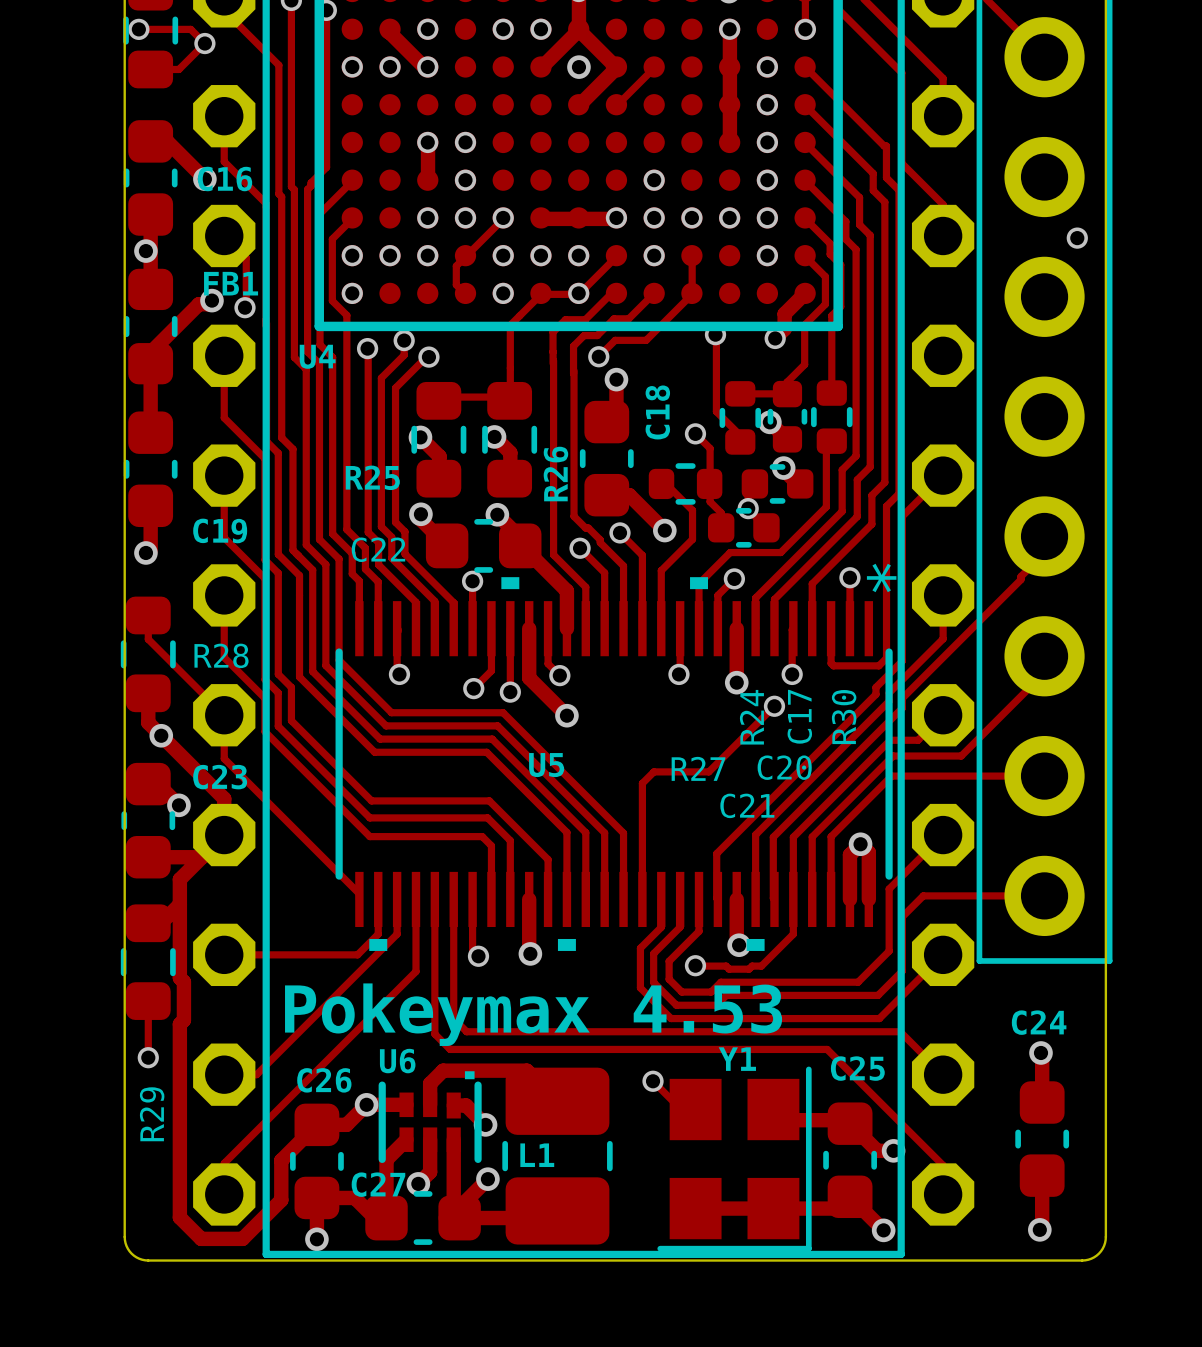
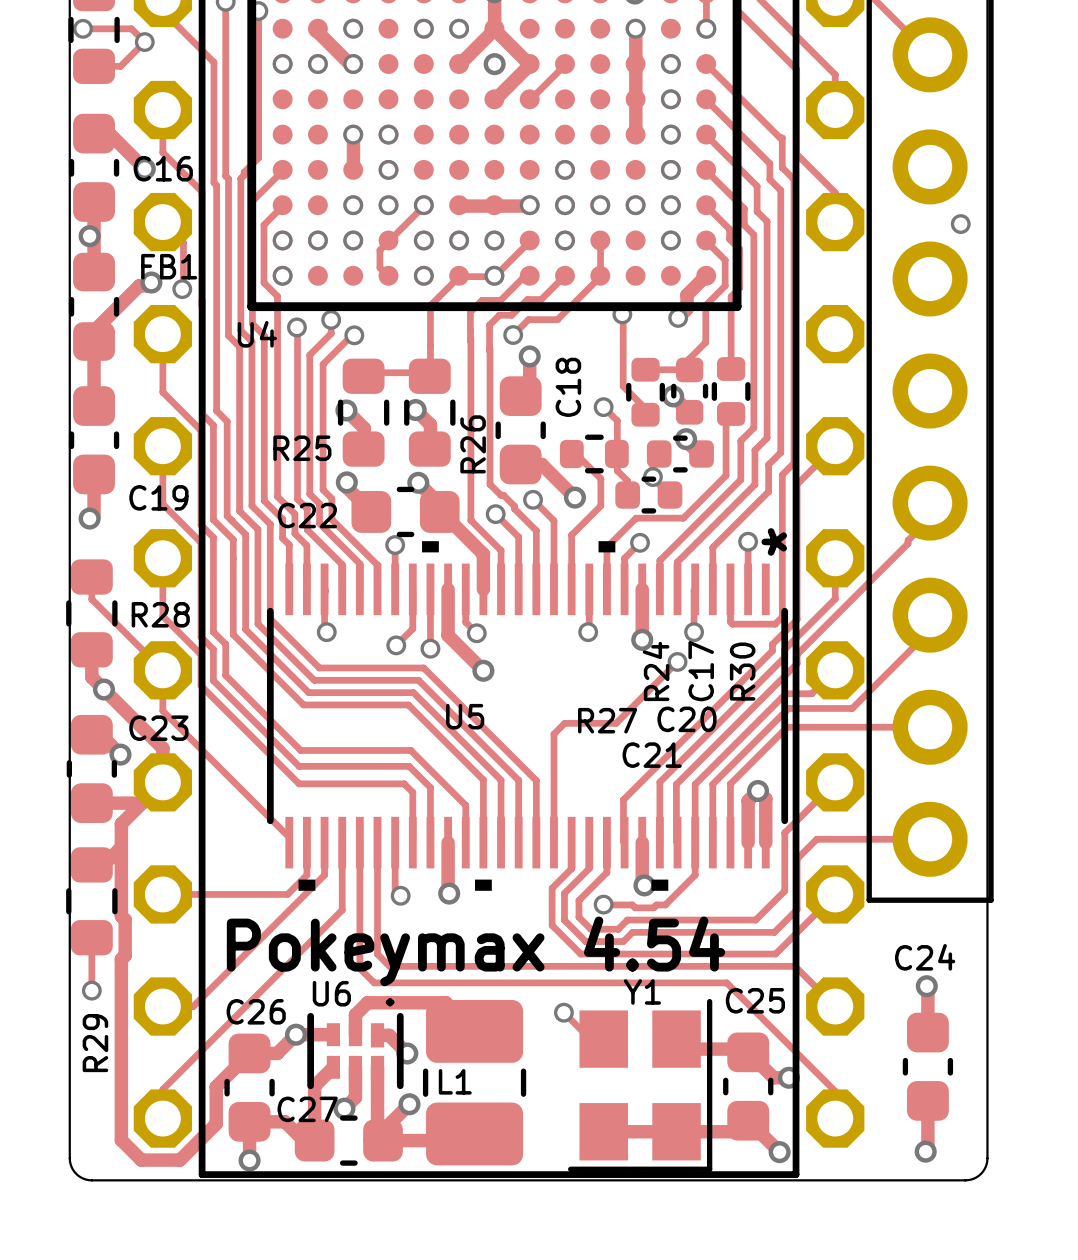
text: Pokeymax 4.53 (533, 1014) -> Pokeymax 4.54 (476, 951)

